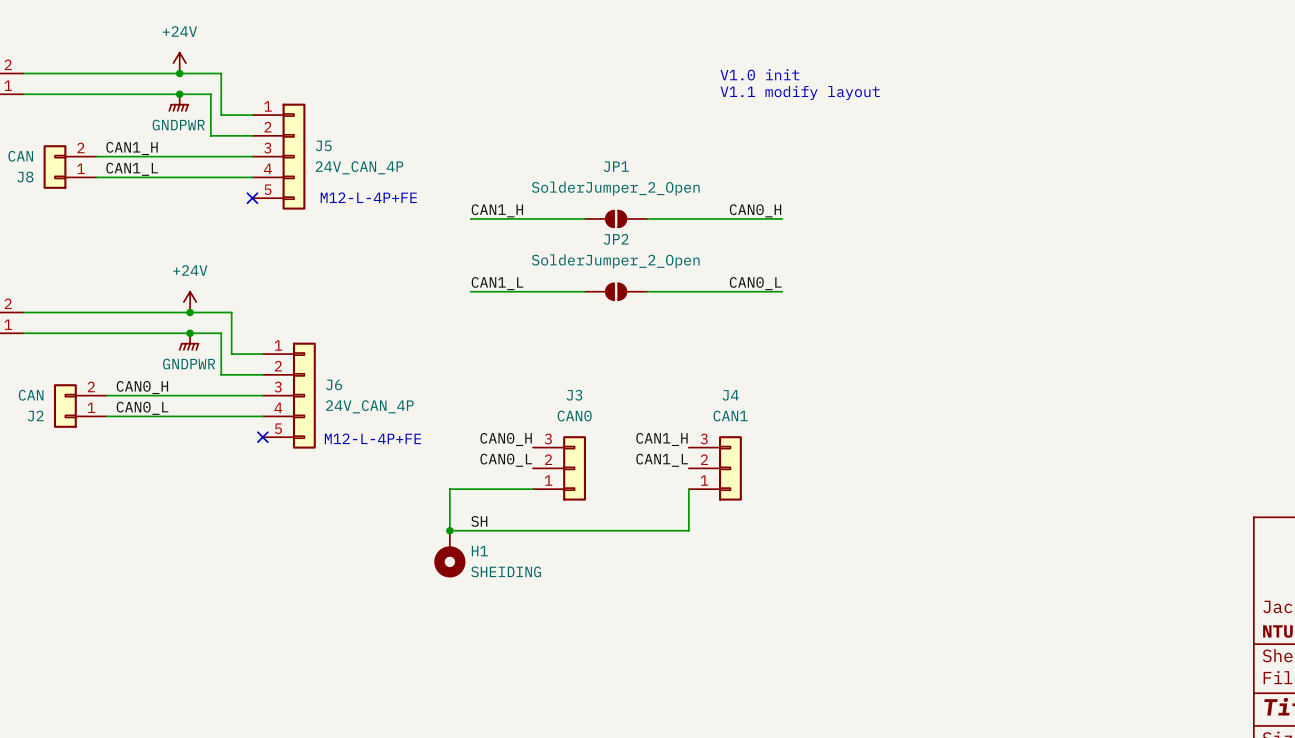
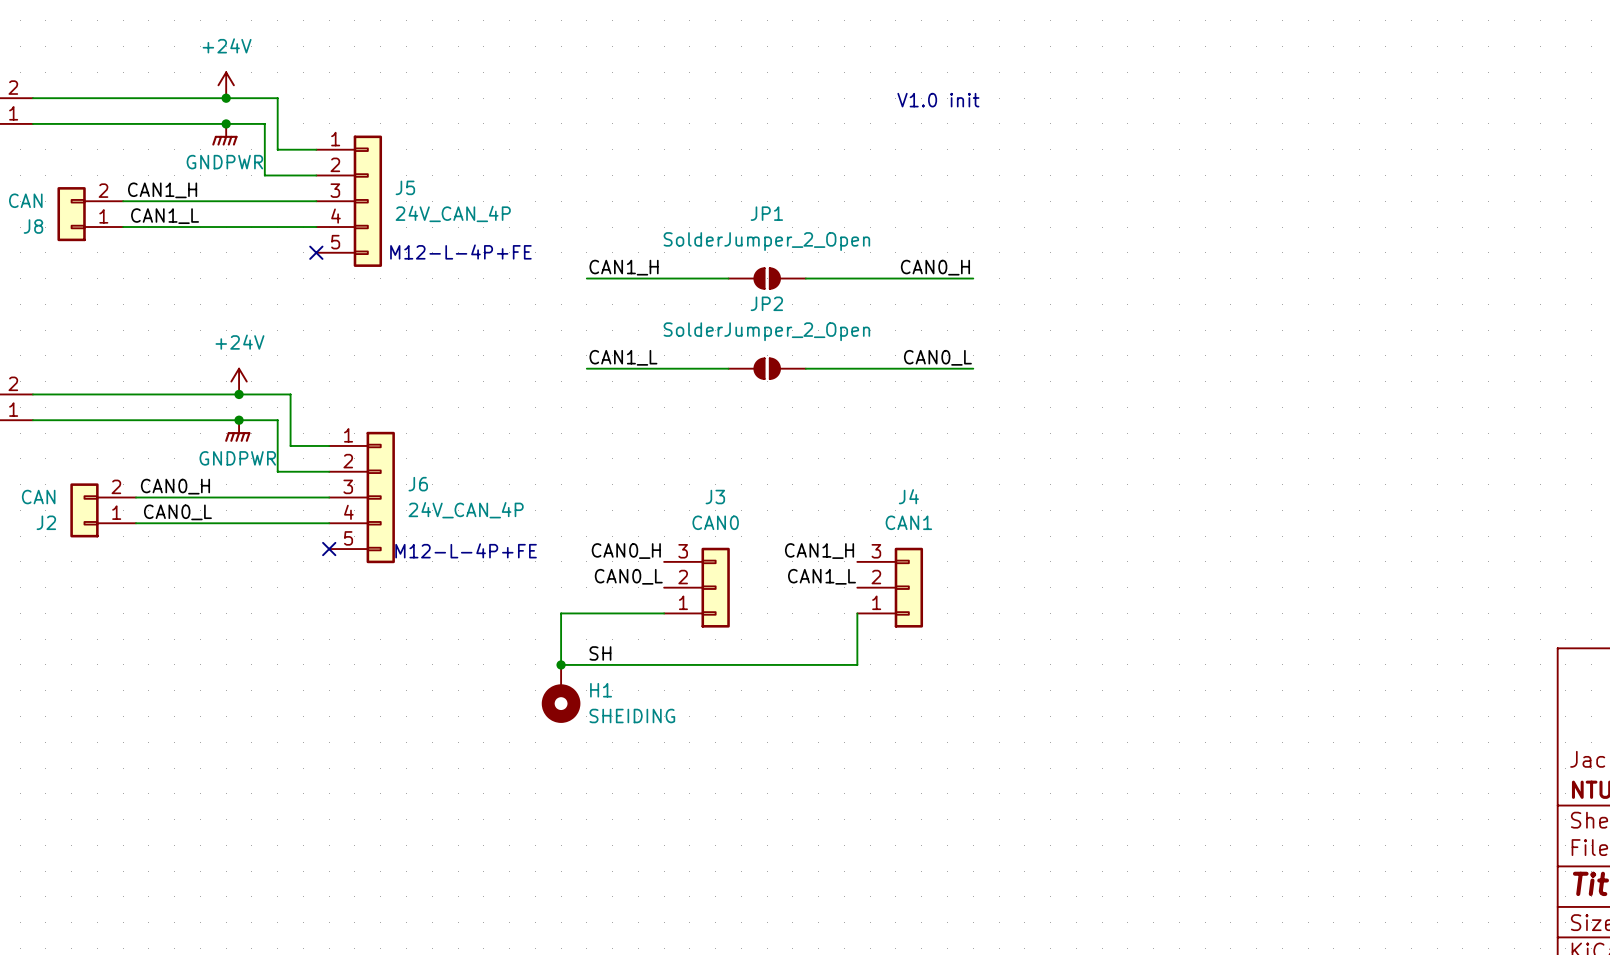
text: V1.1 modify layout (800, 92) -> none

